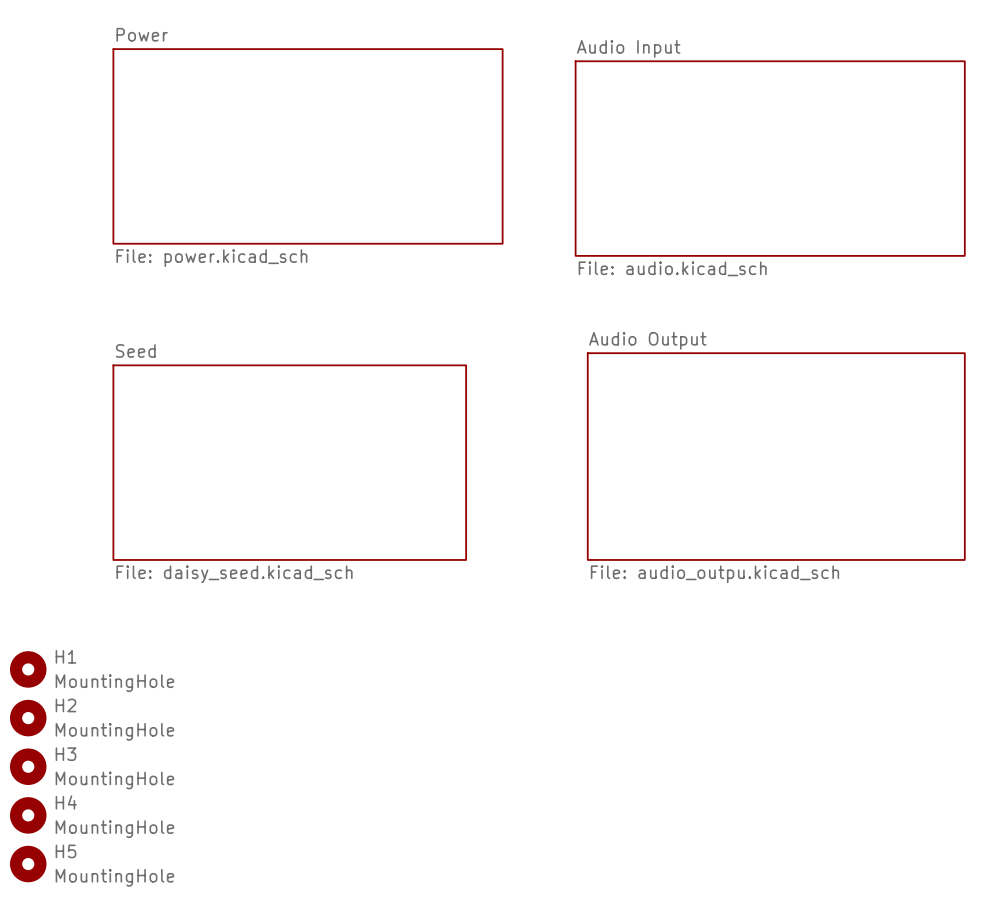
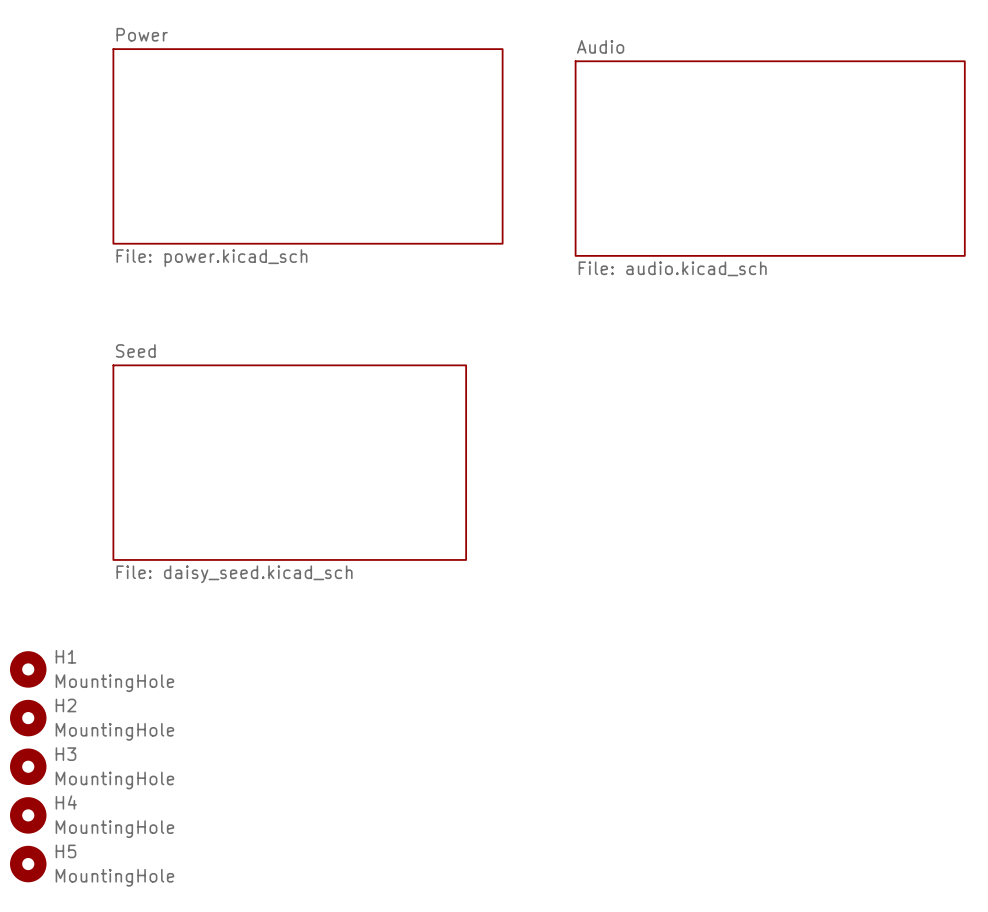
sheet Audio Input name: Audio Input (628, 48) -> Audio (600, 46)
sheet Audio Output: File: audio_outpu.kicad_sch (776, 456) -> none

